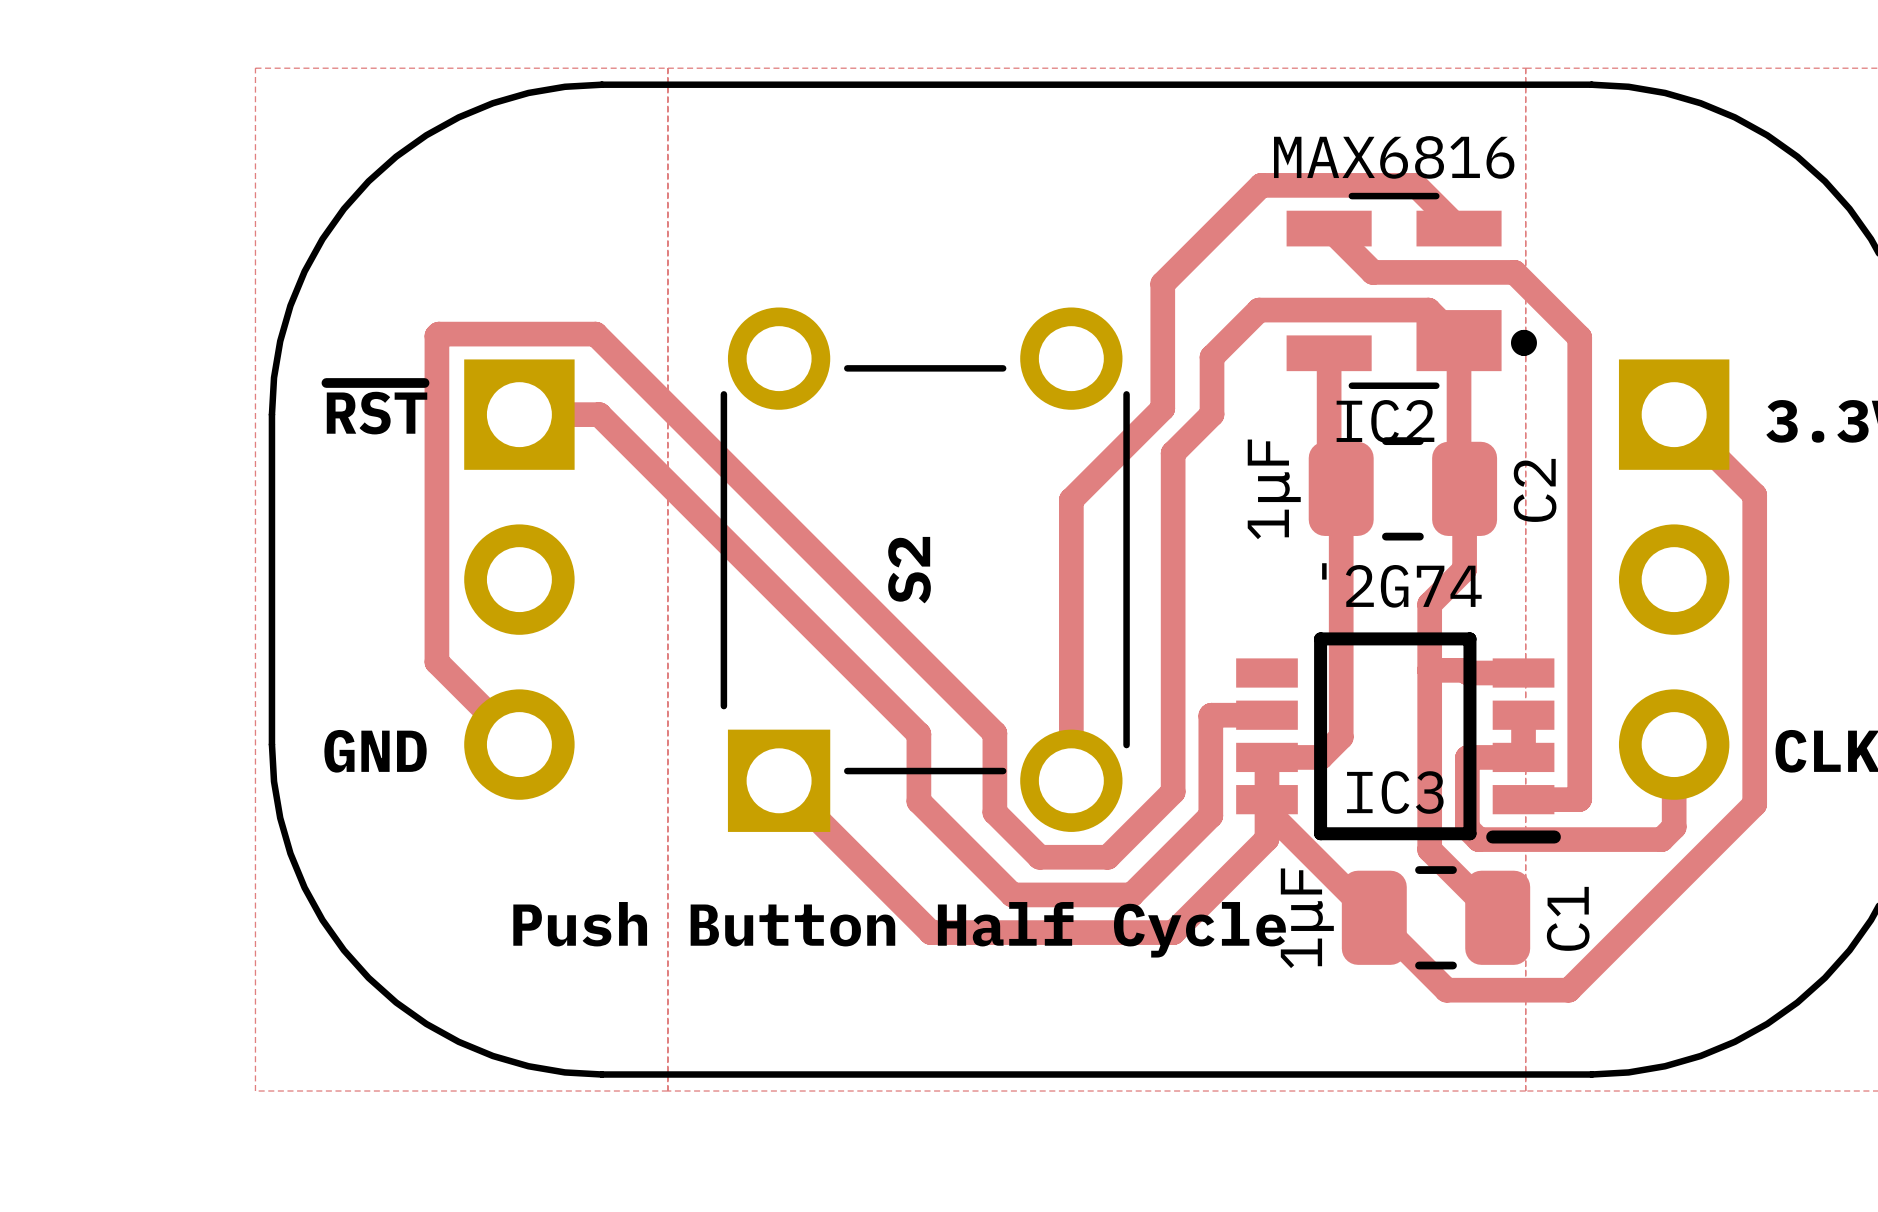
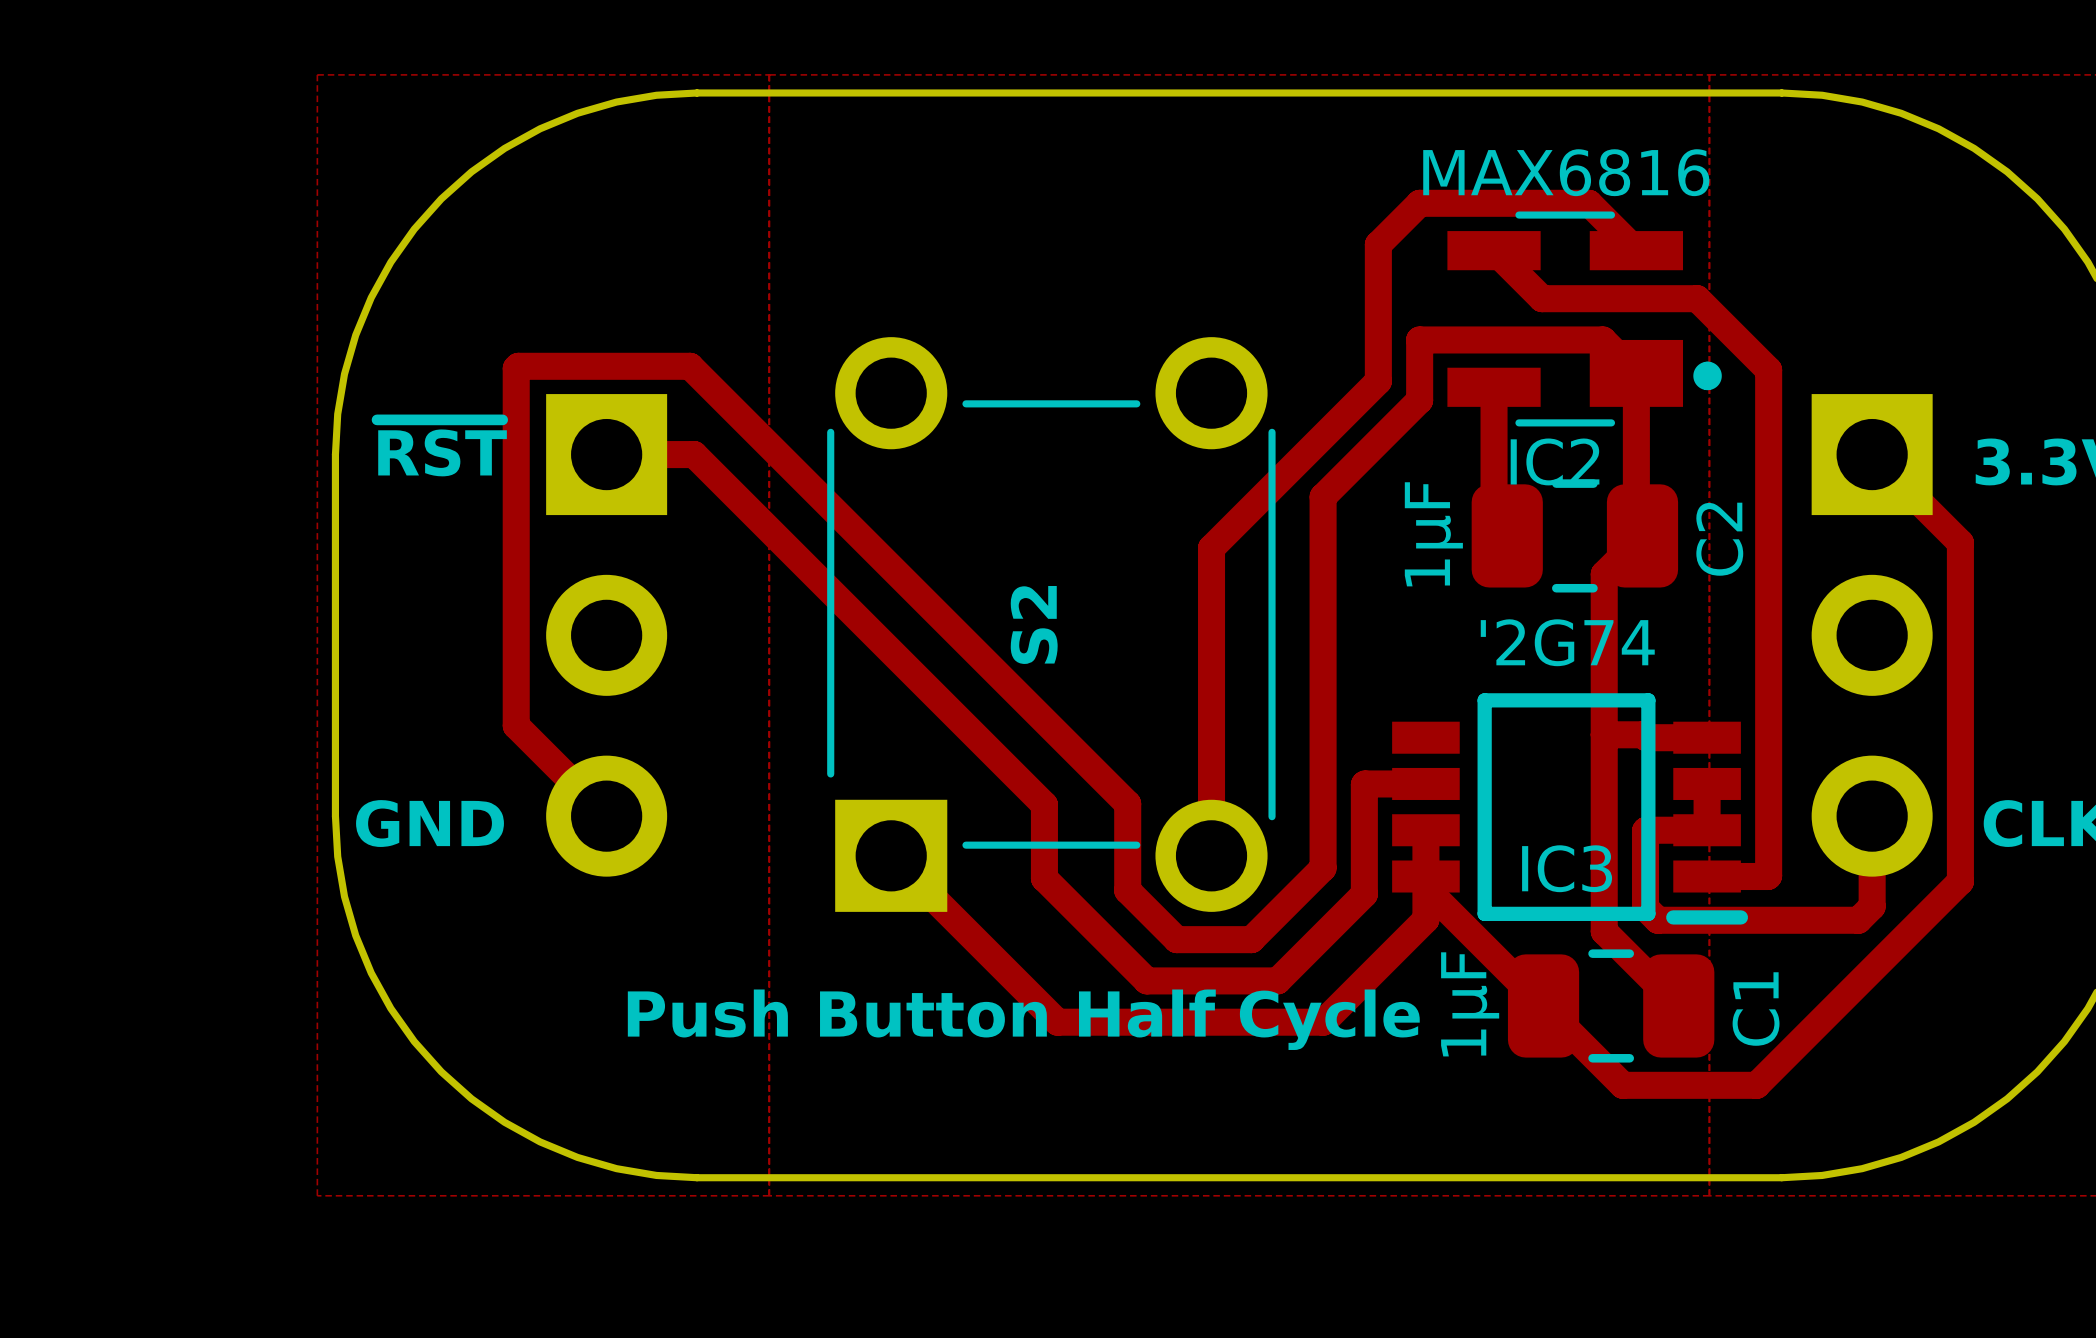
track: (1223, 223) (1162, 283) (1162, 408) -> (1378, 244) (1378, 381) (1311, 447)
track: (1261, 310) (1259, 310) (1212, 357) (1212, 414) -> (1419, 339) (1419, 400) (1365, 454)
track: (1341, 488) (1341, 737) (1320, 757) (1267, 757) -> none
track: (1464, 488) (1464, 569) (1429, 604) -> (1642, 535) (1604, 574) (1604, 662)

